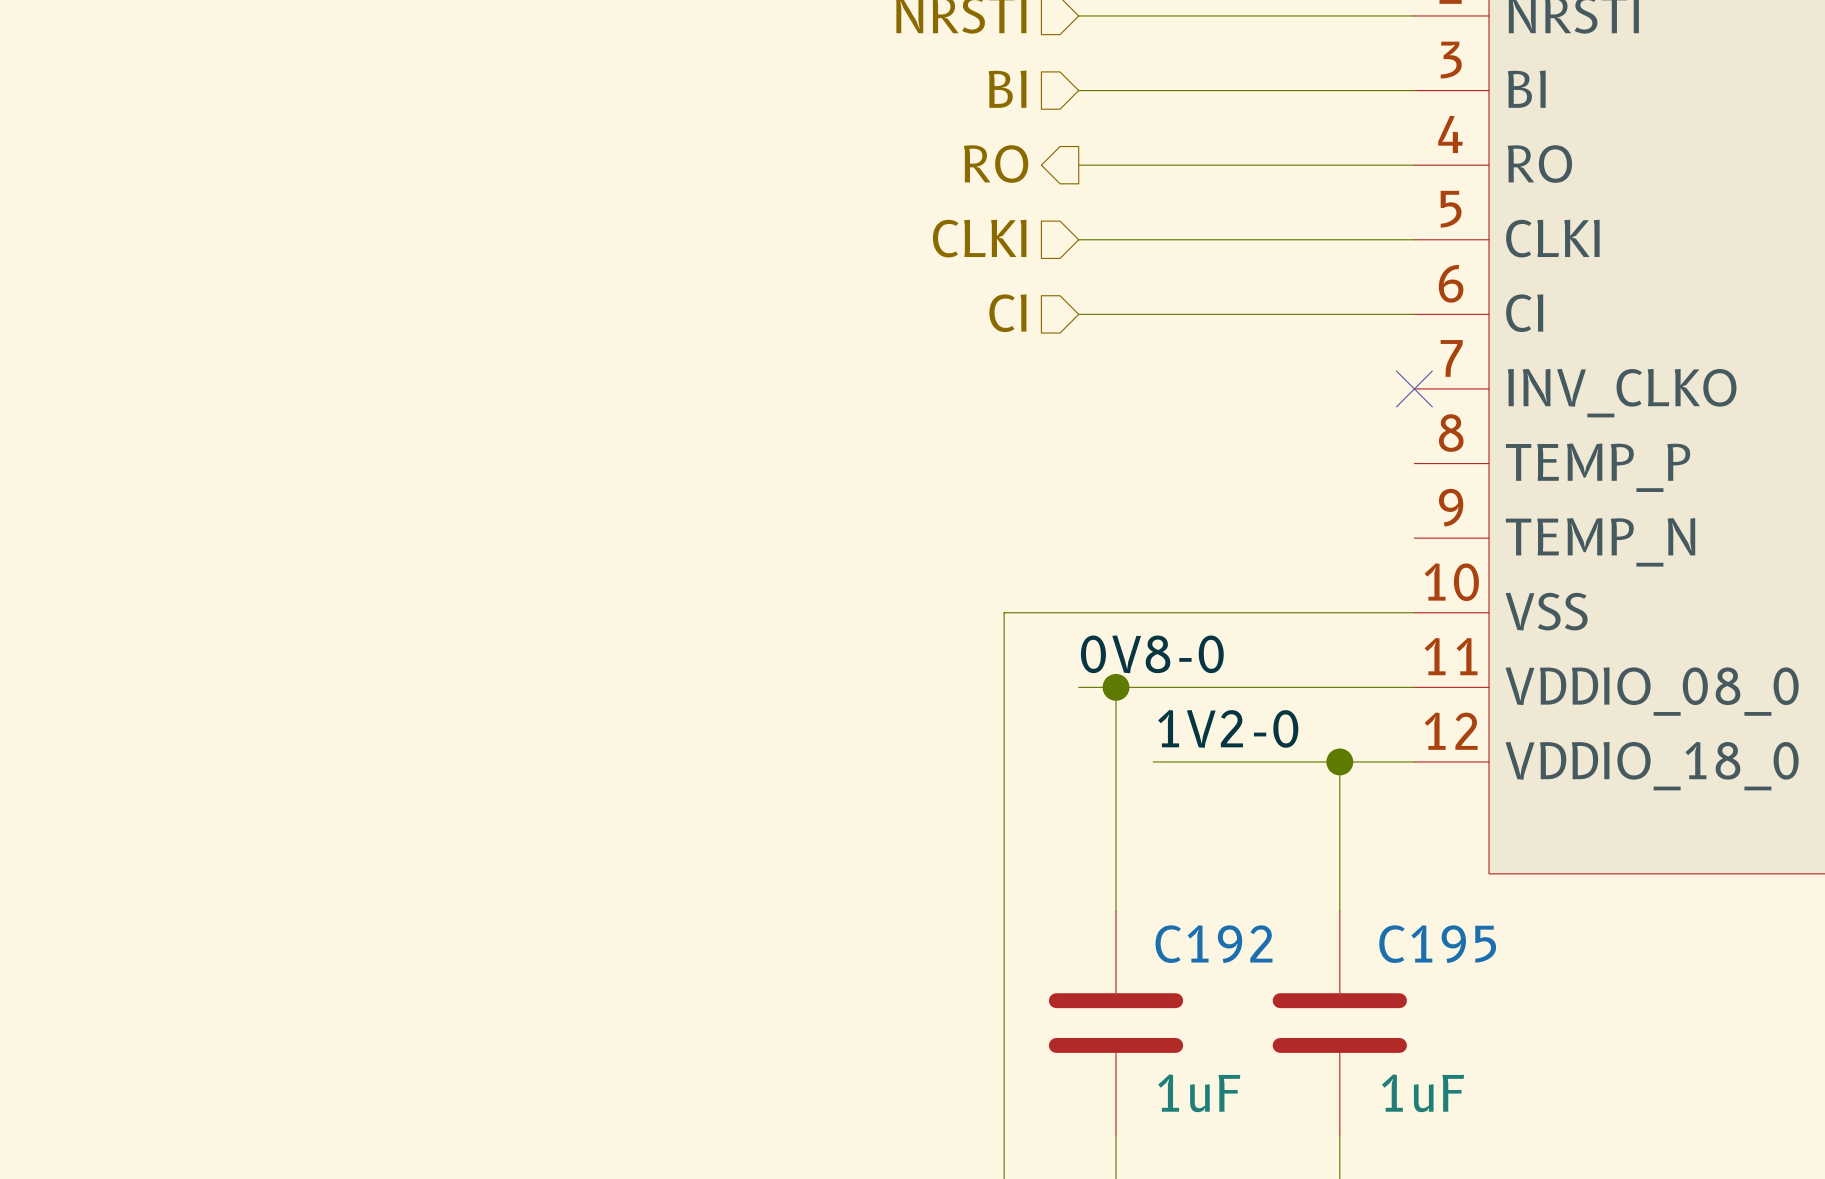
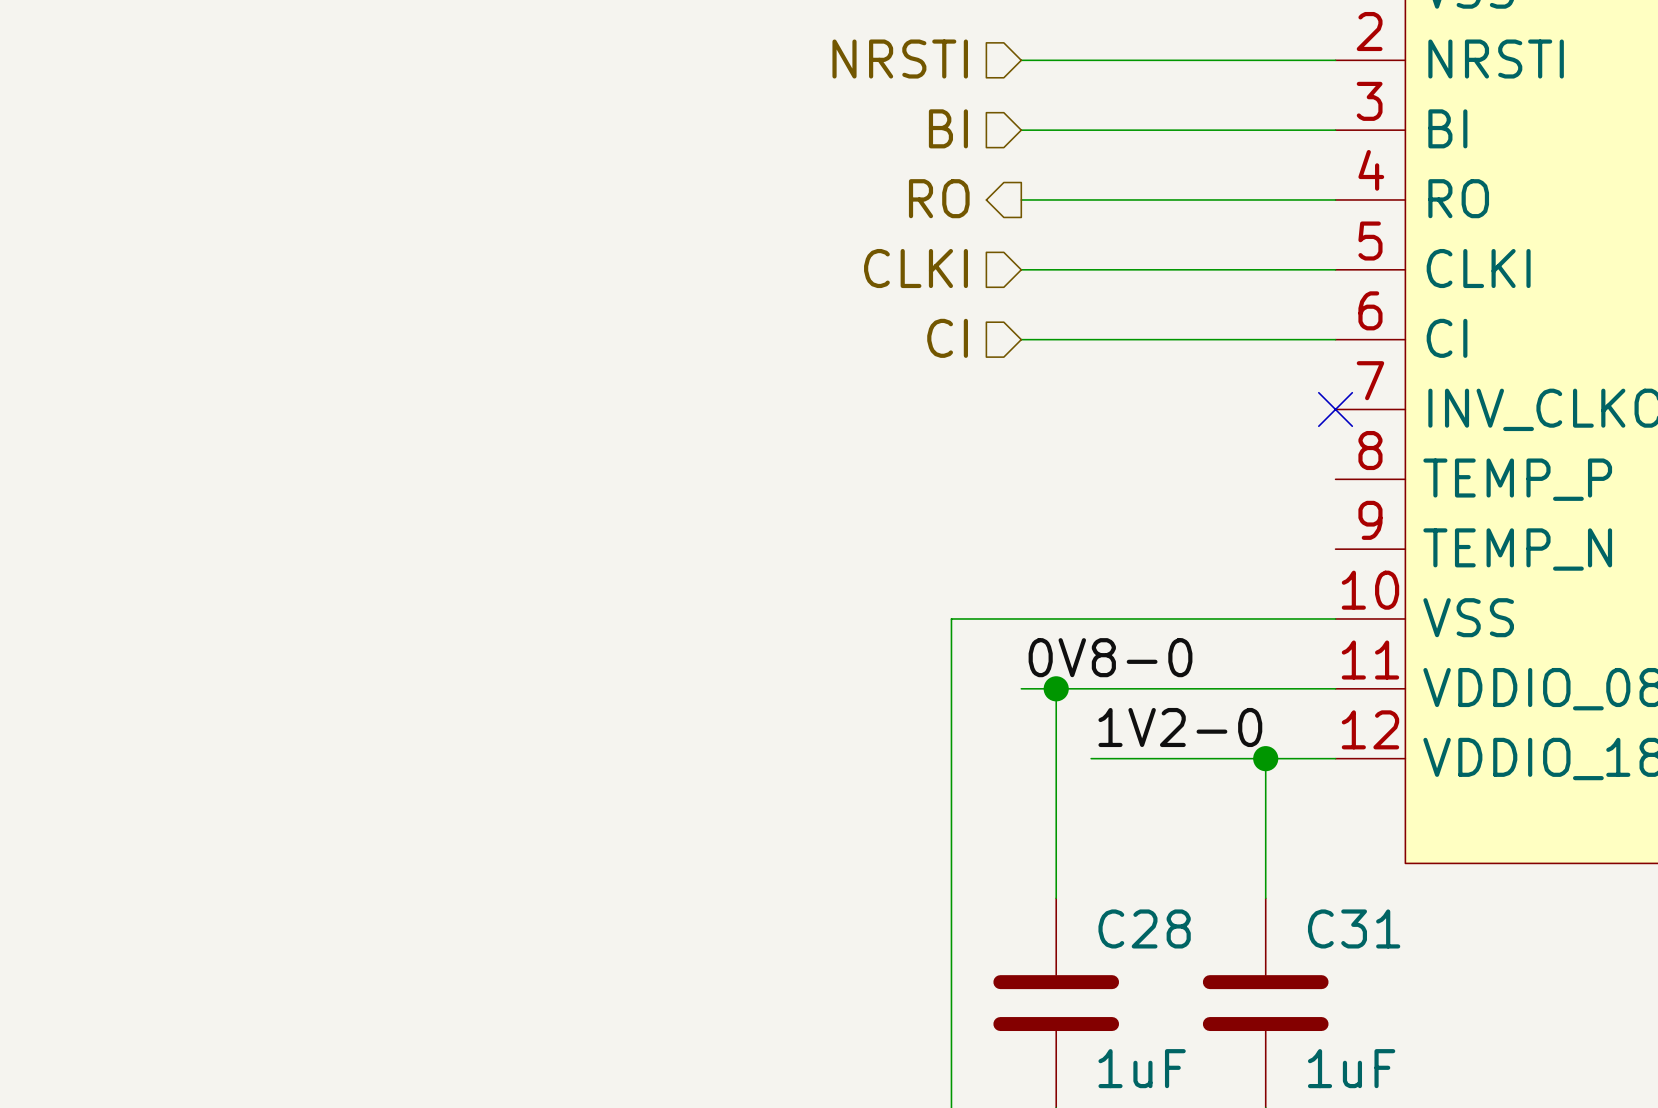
C192 name: C192 (1213, 944) -> C28 (1144, 928)
C195 name: C195 (1437, 944) -> C31 (1354, 928)

